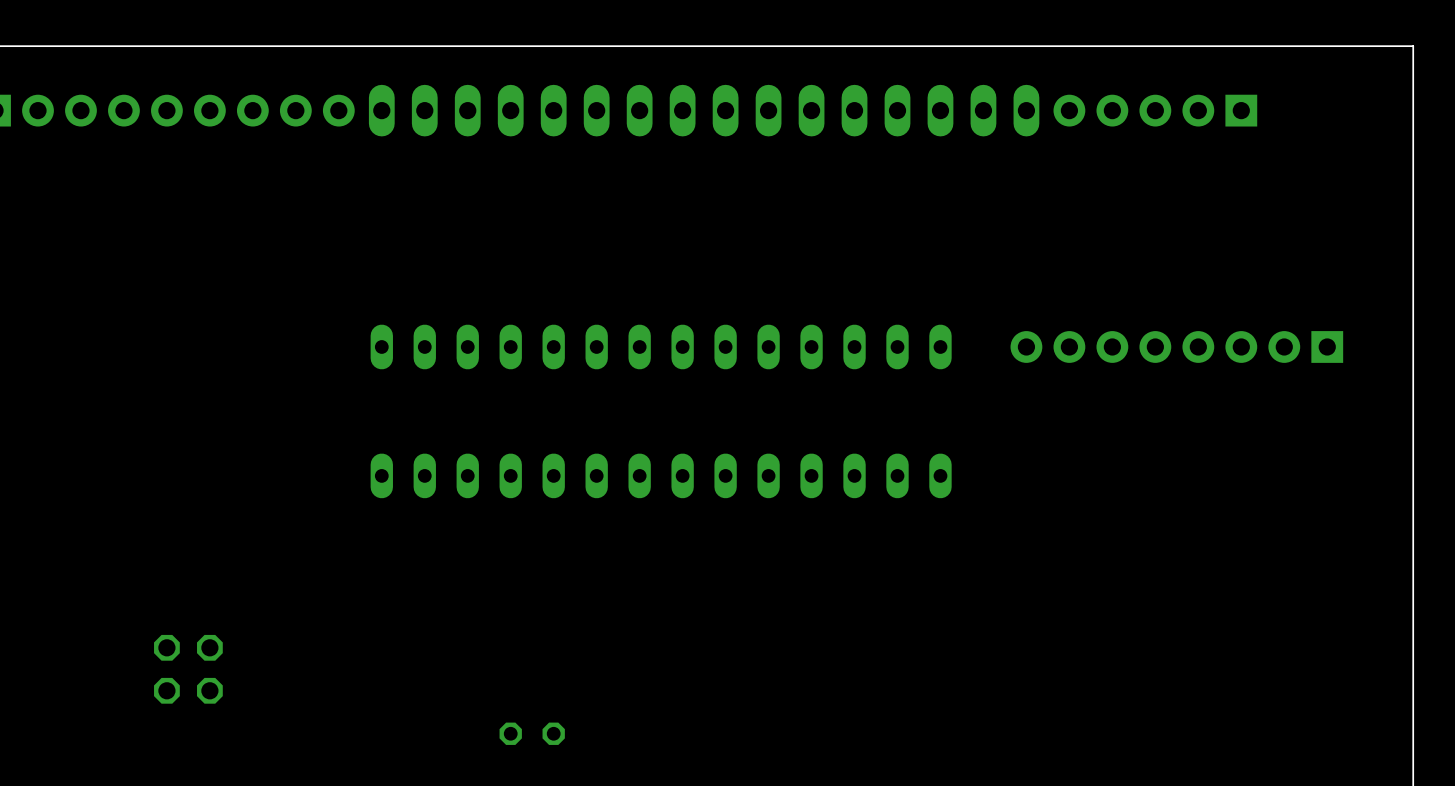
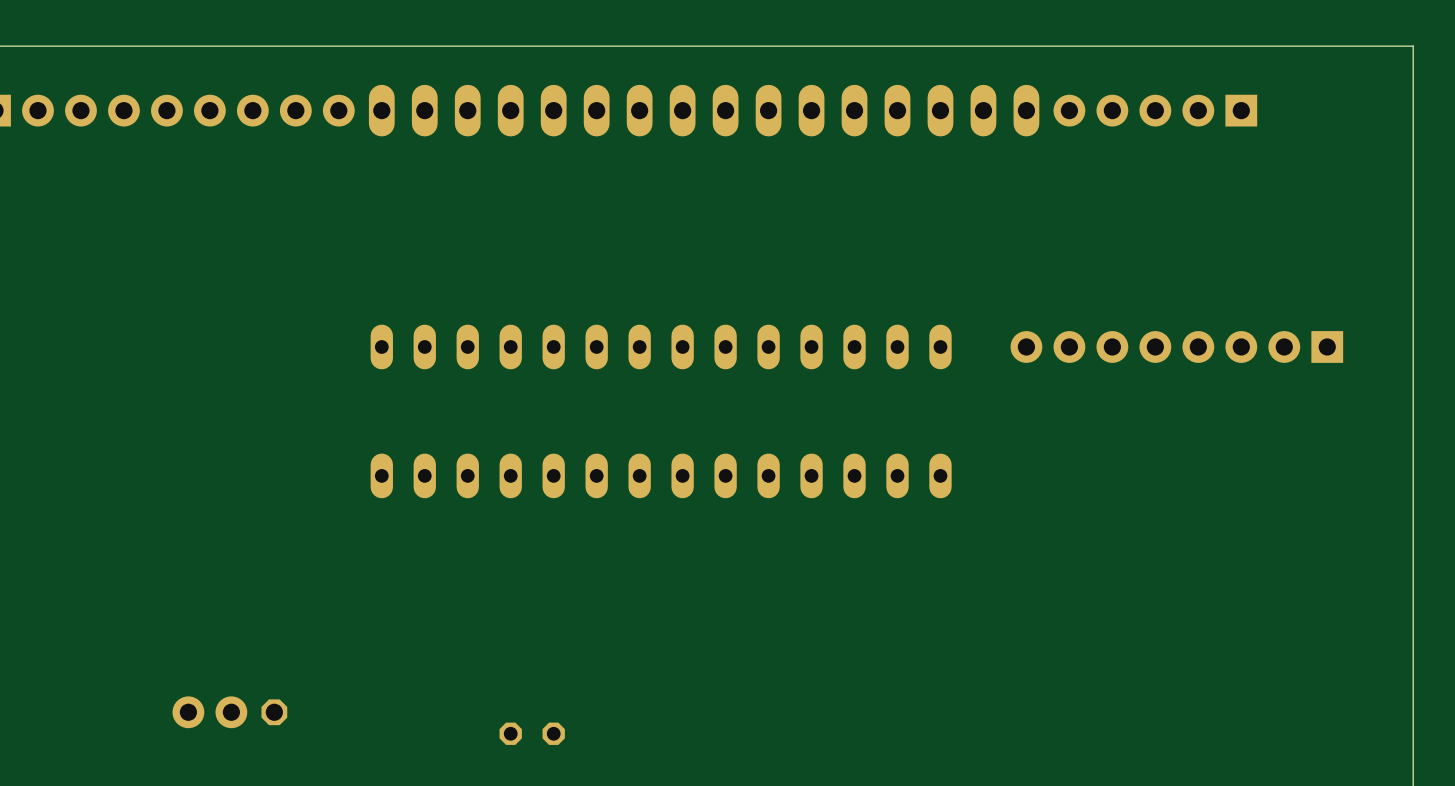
part: (188, 669) -> none
part: none -> (209, 712)
part: none -> (274, 712)

